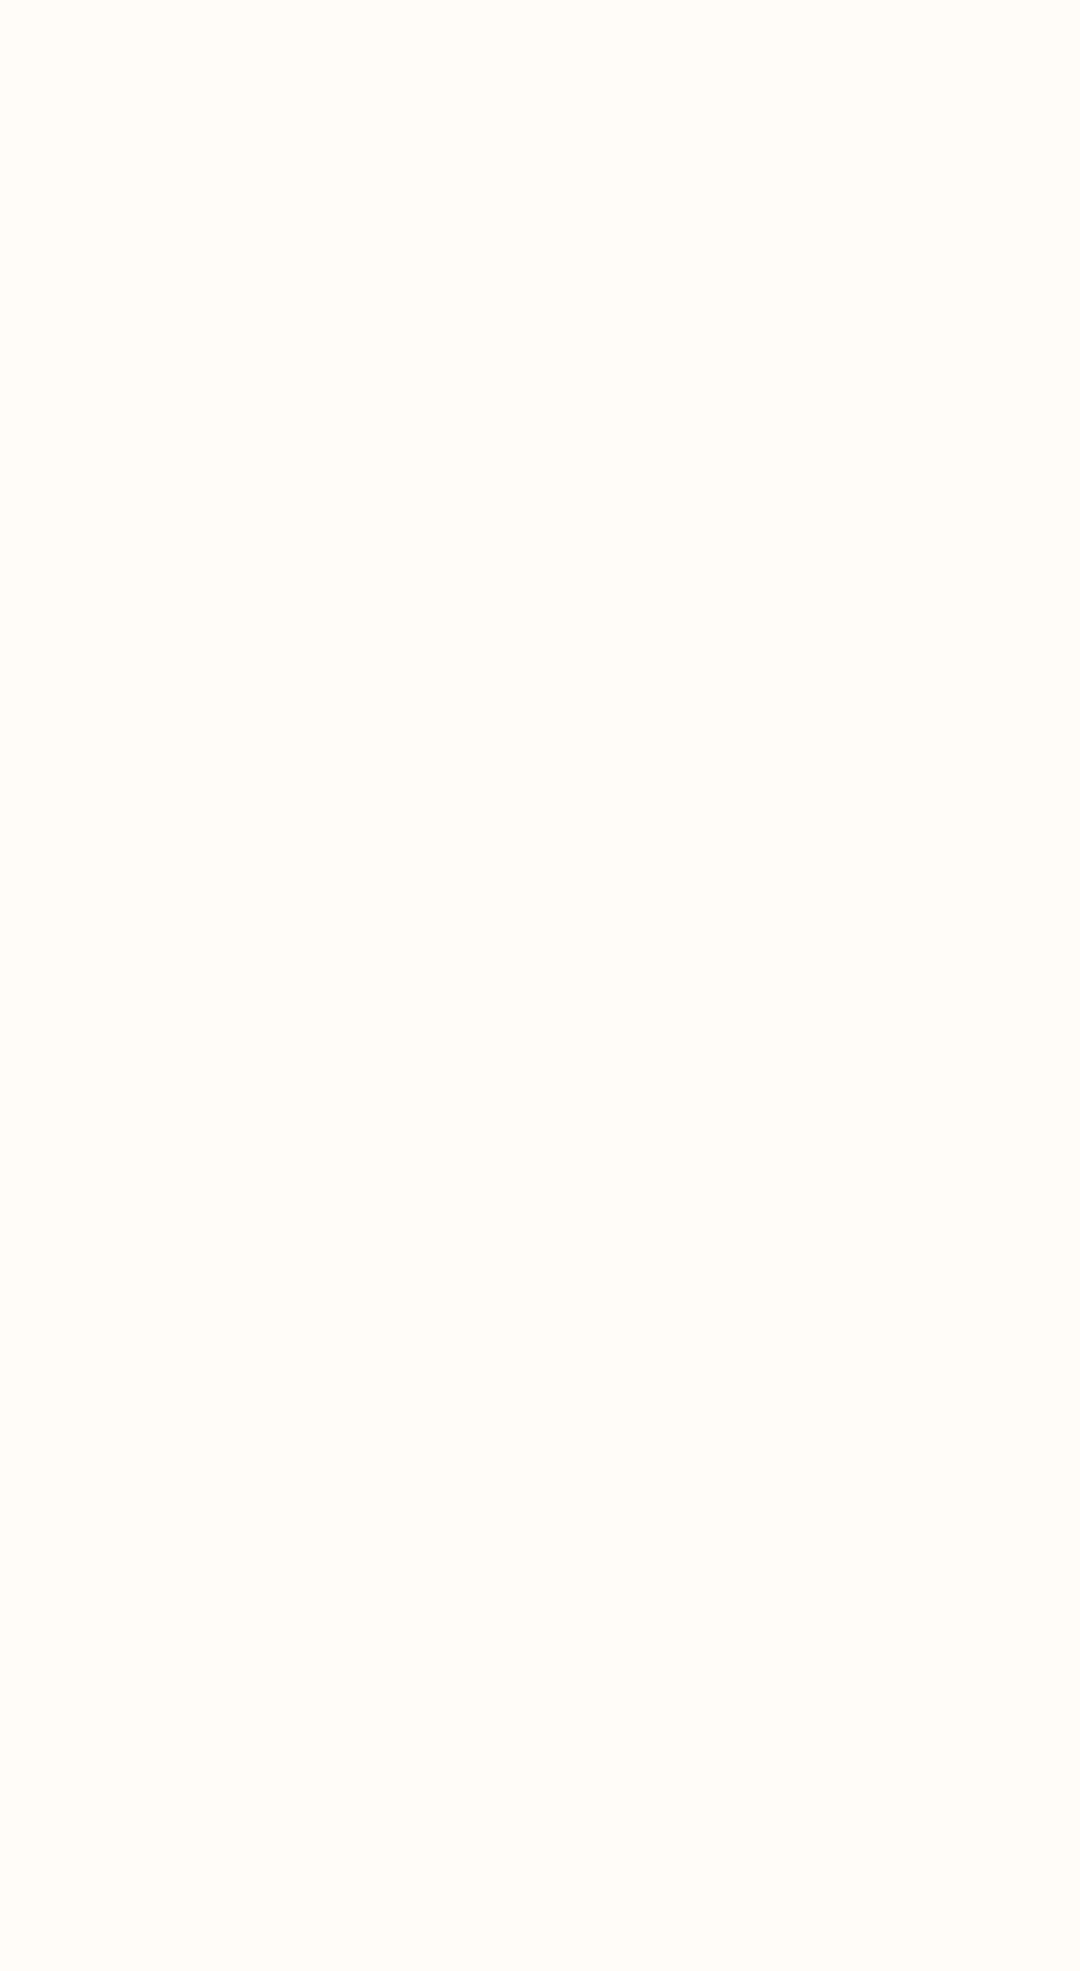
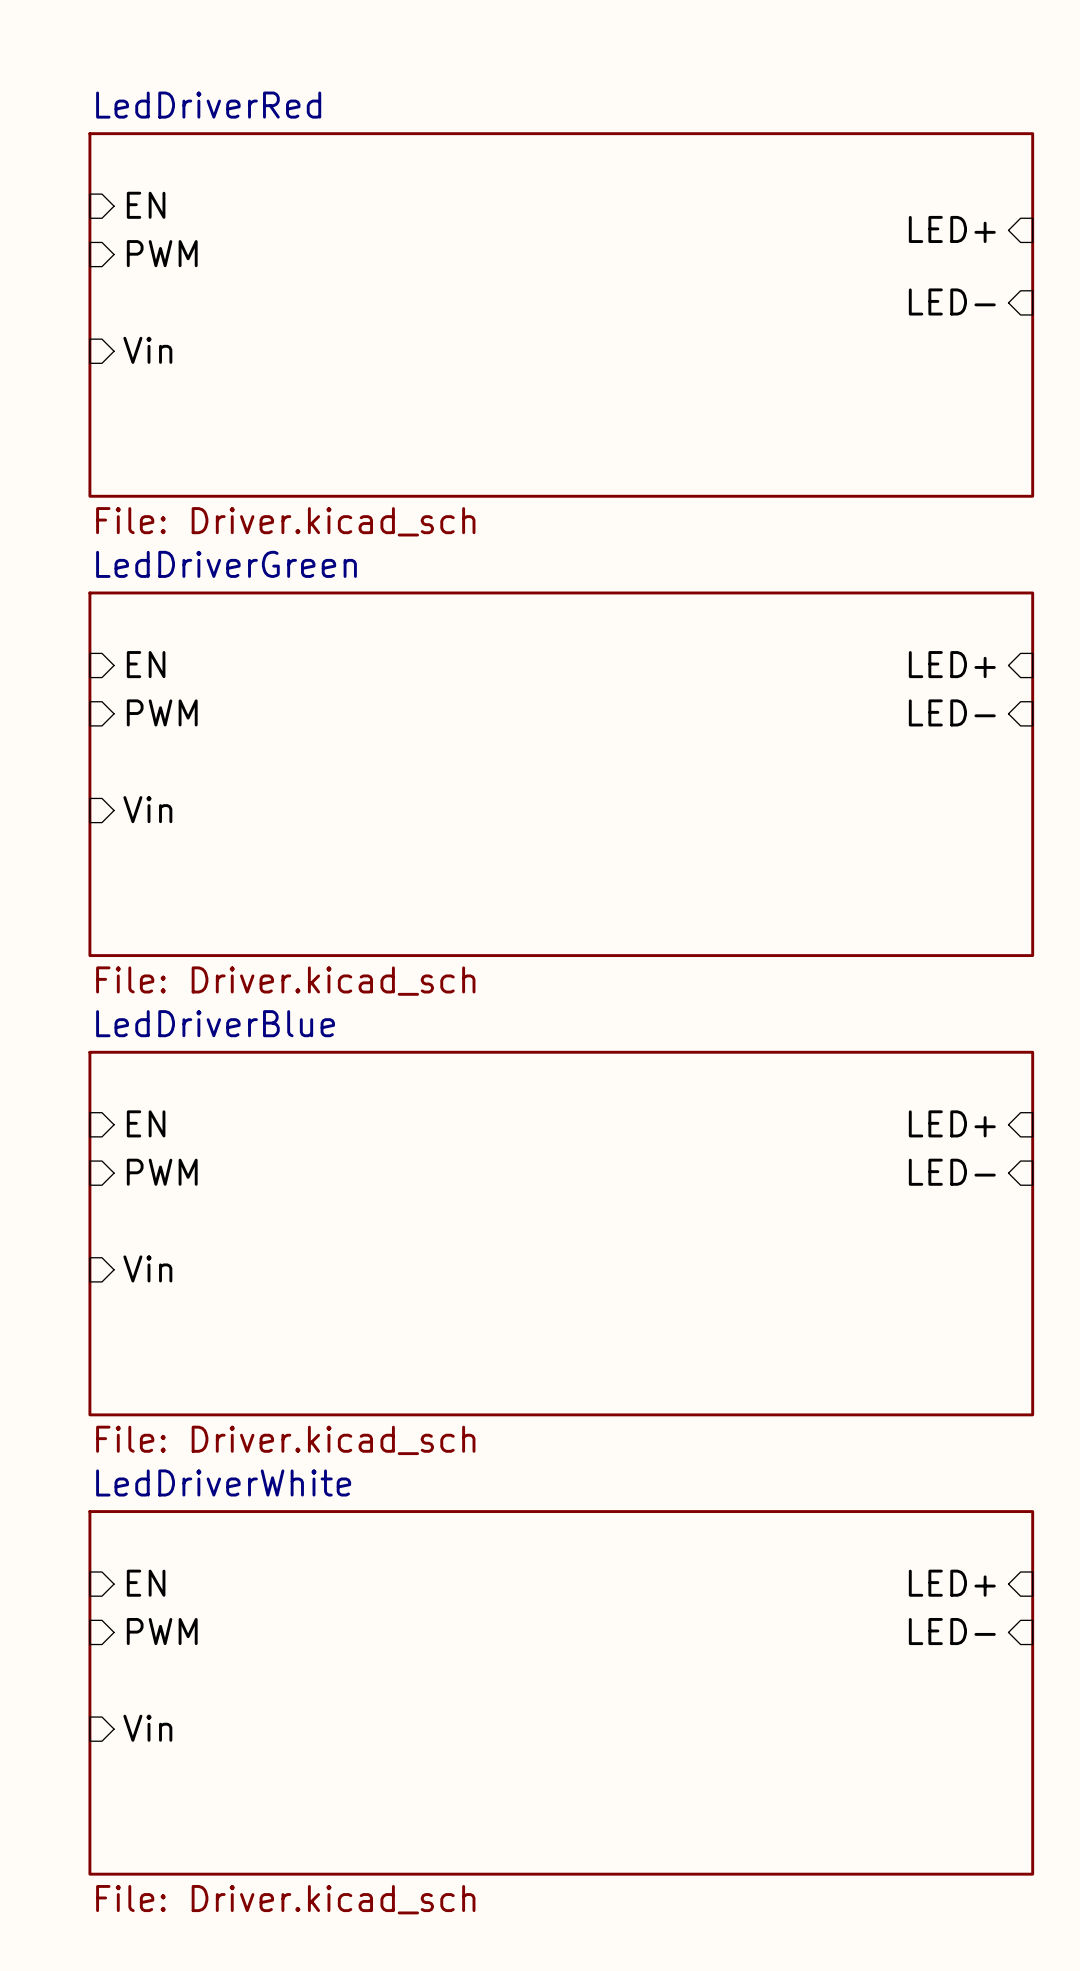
sheet pin: none -> EN (146, 205)
sheet pin: none -> LED+ (952, 229)
sheet pin: none -> PWM (162, 253)
sheet pin: none -> LED- (952, 301)
sheet LedDriverRed: none -> File: Driver.kicad_sch (561, 314)
sheet pin: none -> Vin (147, 350)
sheet pin: none -> EN (146, 664)
sheet pin: none -> LED+ (952, 664)
sheet pin: none -> PWM (162, 712)
sheet pin: none -> LED- (952, 712)
sheet LedDriverGreen: none -> File: Driver.kicad_sch (561, 774)
sheet pin: none -> Vin (147, 809)
sheet pin: none -> EN (146, 1123)
sheet pin: none -> LED+ (952, 1123)
sheet pin: none -> PWM (162, 1172)
sheet pin: none -> LED- (952, 1172)
sheet LedDriverBlue: none -> File: Driver.kicad_sch (561, 1233)
sheet pin: none -> Vin (147, 1268)
sheet pin: none -> EN (146, 1583)
sheet pin: none -> LED+ (952, 1583)
sheet pin: none -> PWM (162, 1631)
sheet pin: none -> LED- (952, 1631)
sheet LedDriverWhite: none -> File: Driver.kicad_sch (561, 1692)
sheet pin: none -> Vin (147, 1728)

